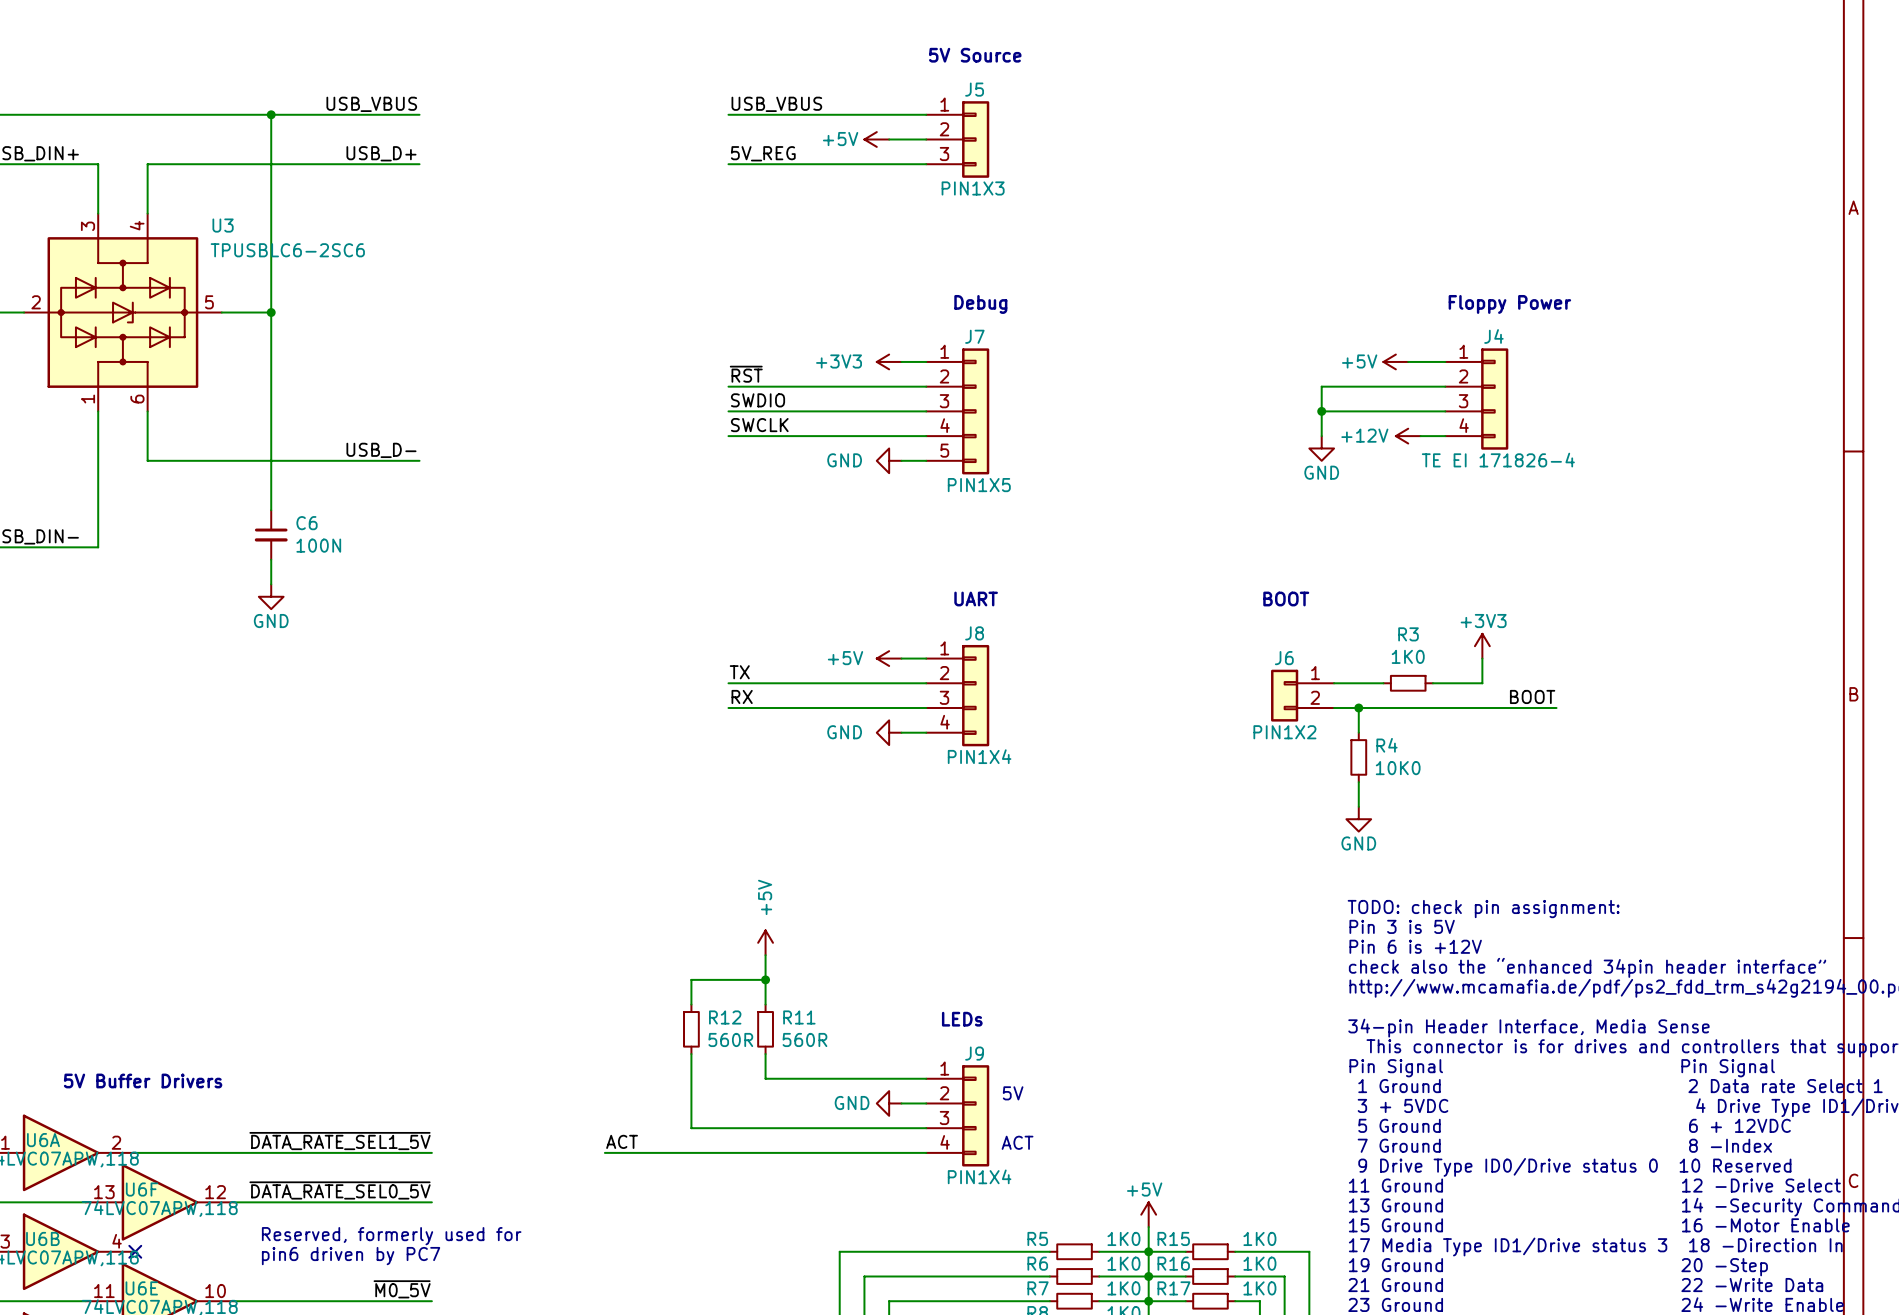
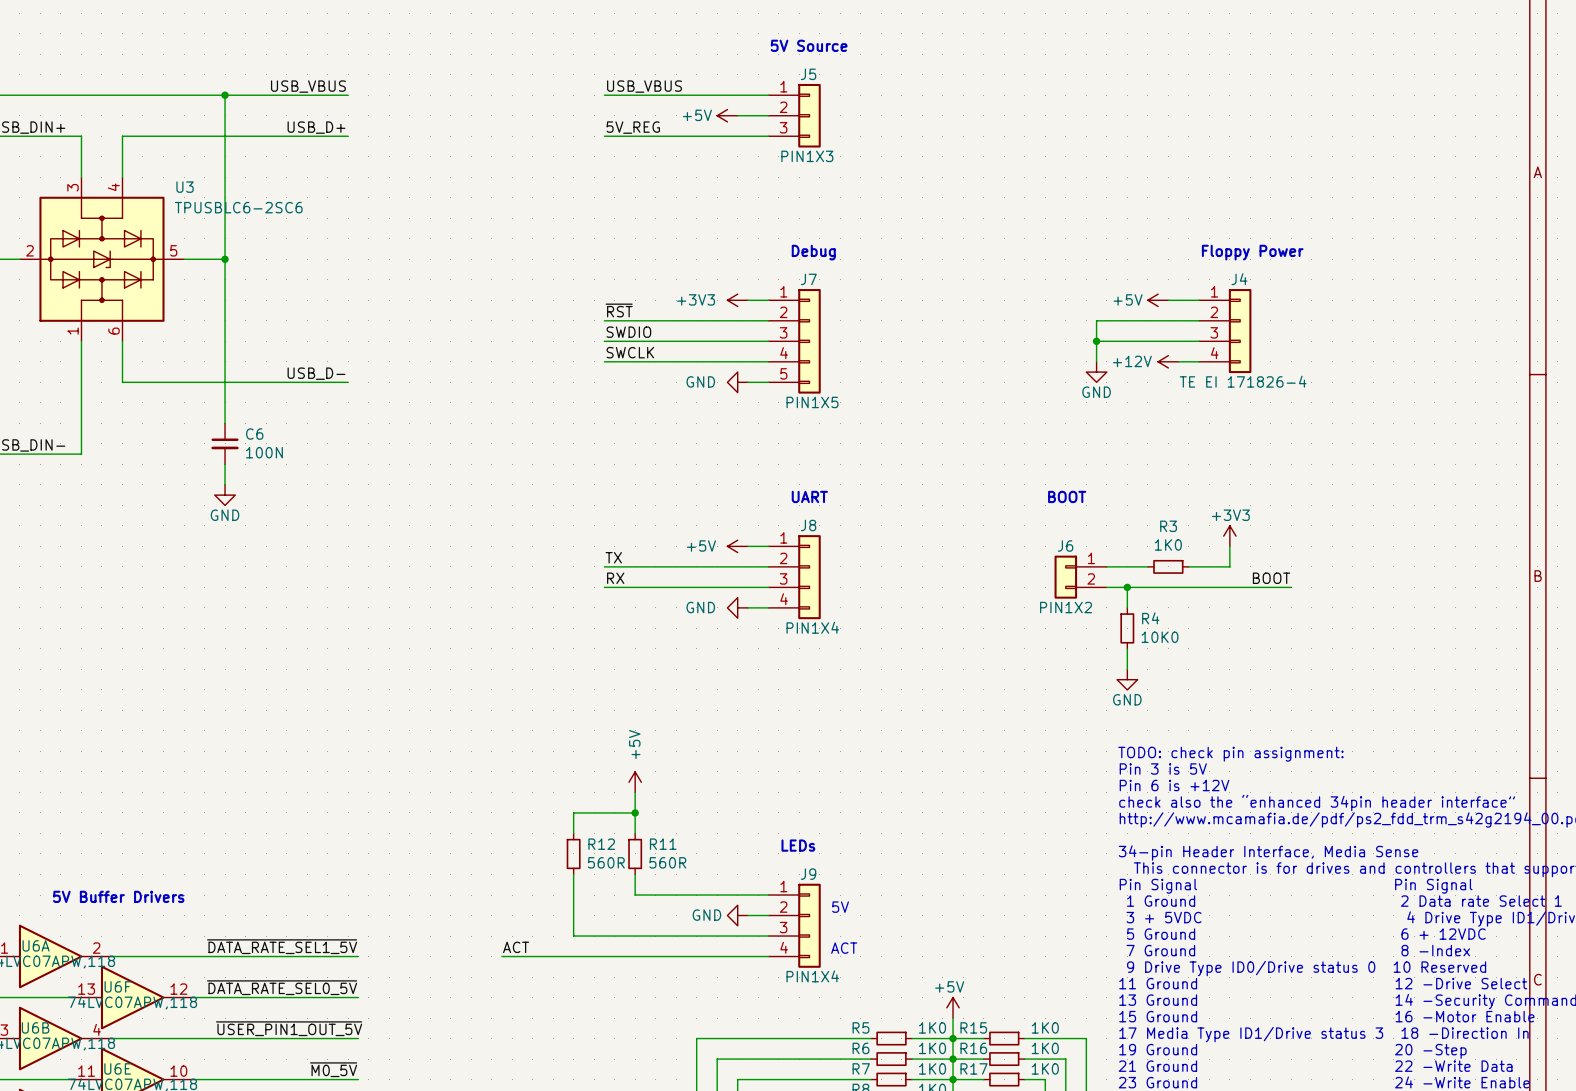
text: Reserved, formerly used for (391, 1236) -> none
label: none -> ~{USER_PIN1_OUT_5V} (289, 1028)
wire: none -> (112, 1038) (358, 1038)
no-connect mark: (135, 1251) -> none
text: pin6 driven by PC7 (351, 1256) -> none

